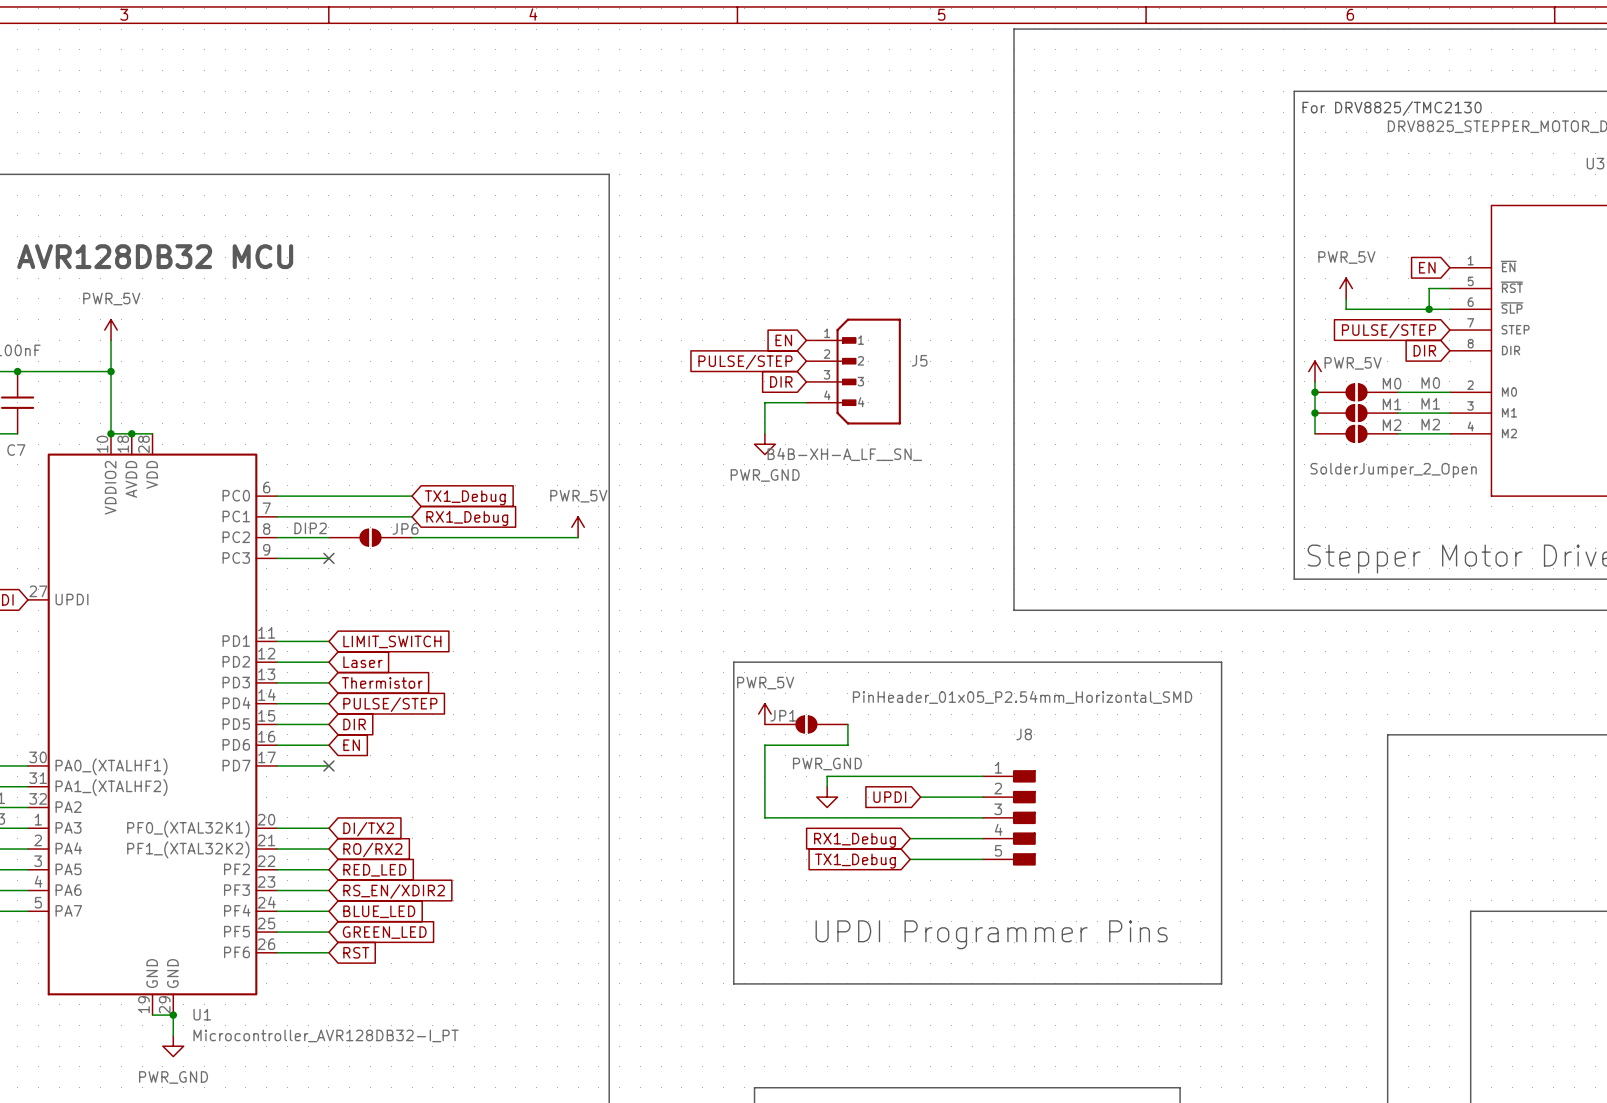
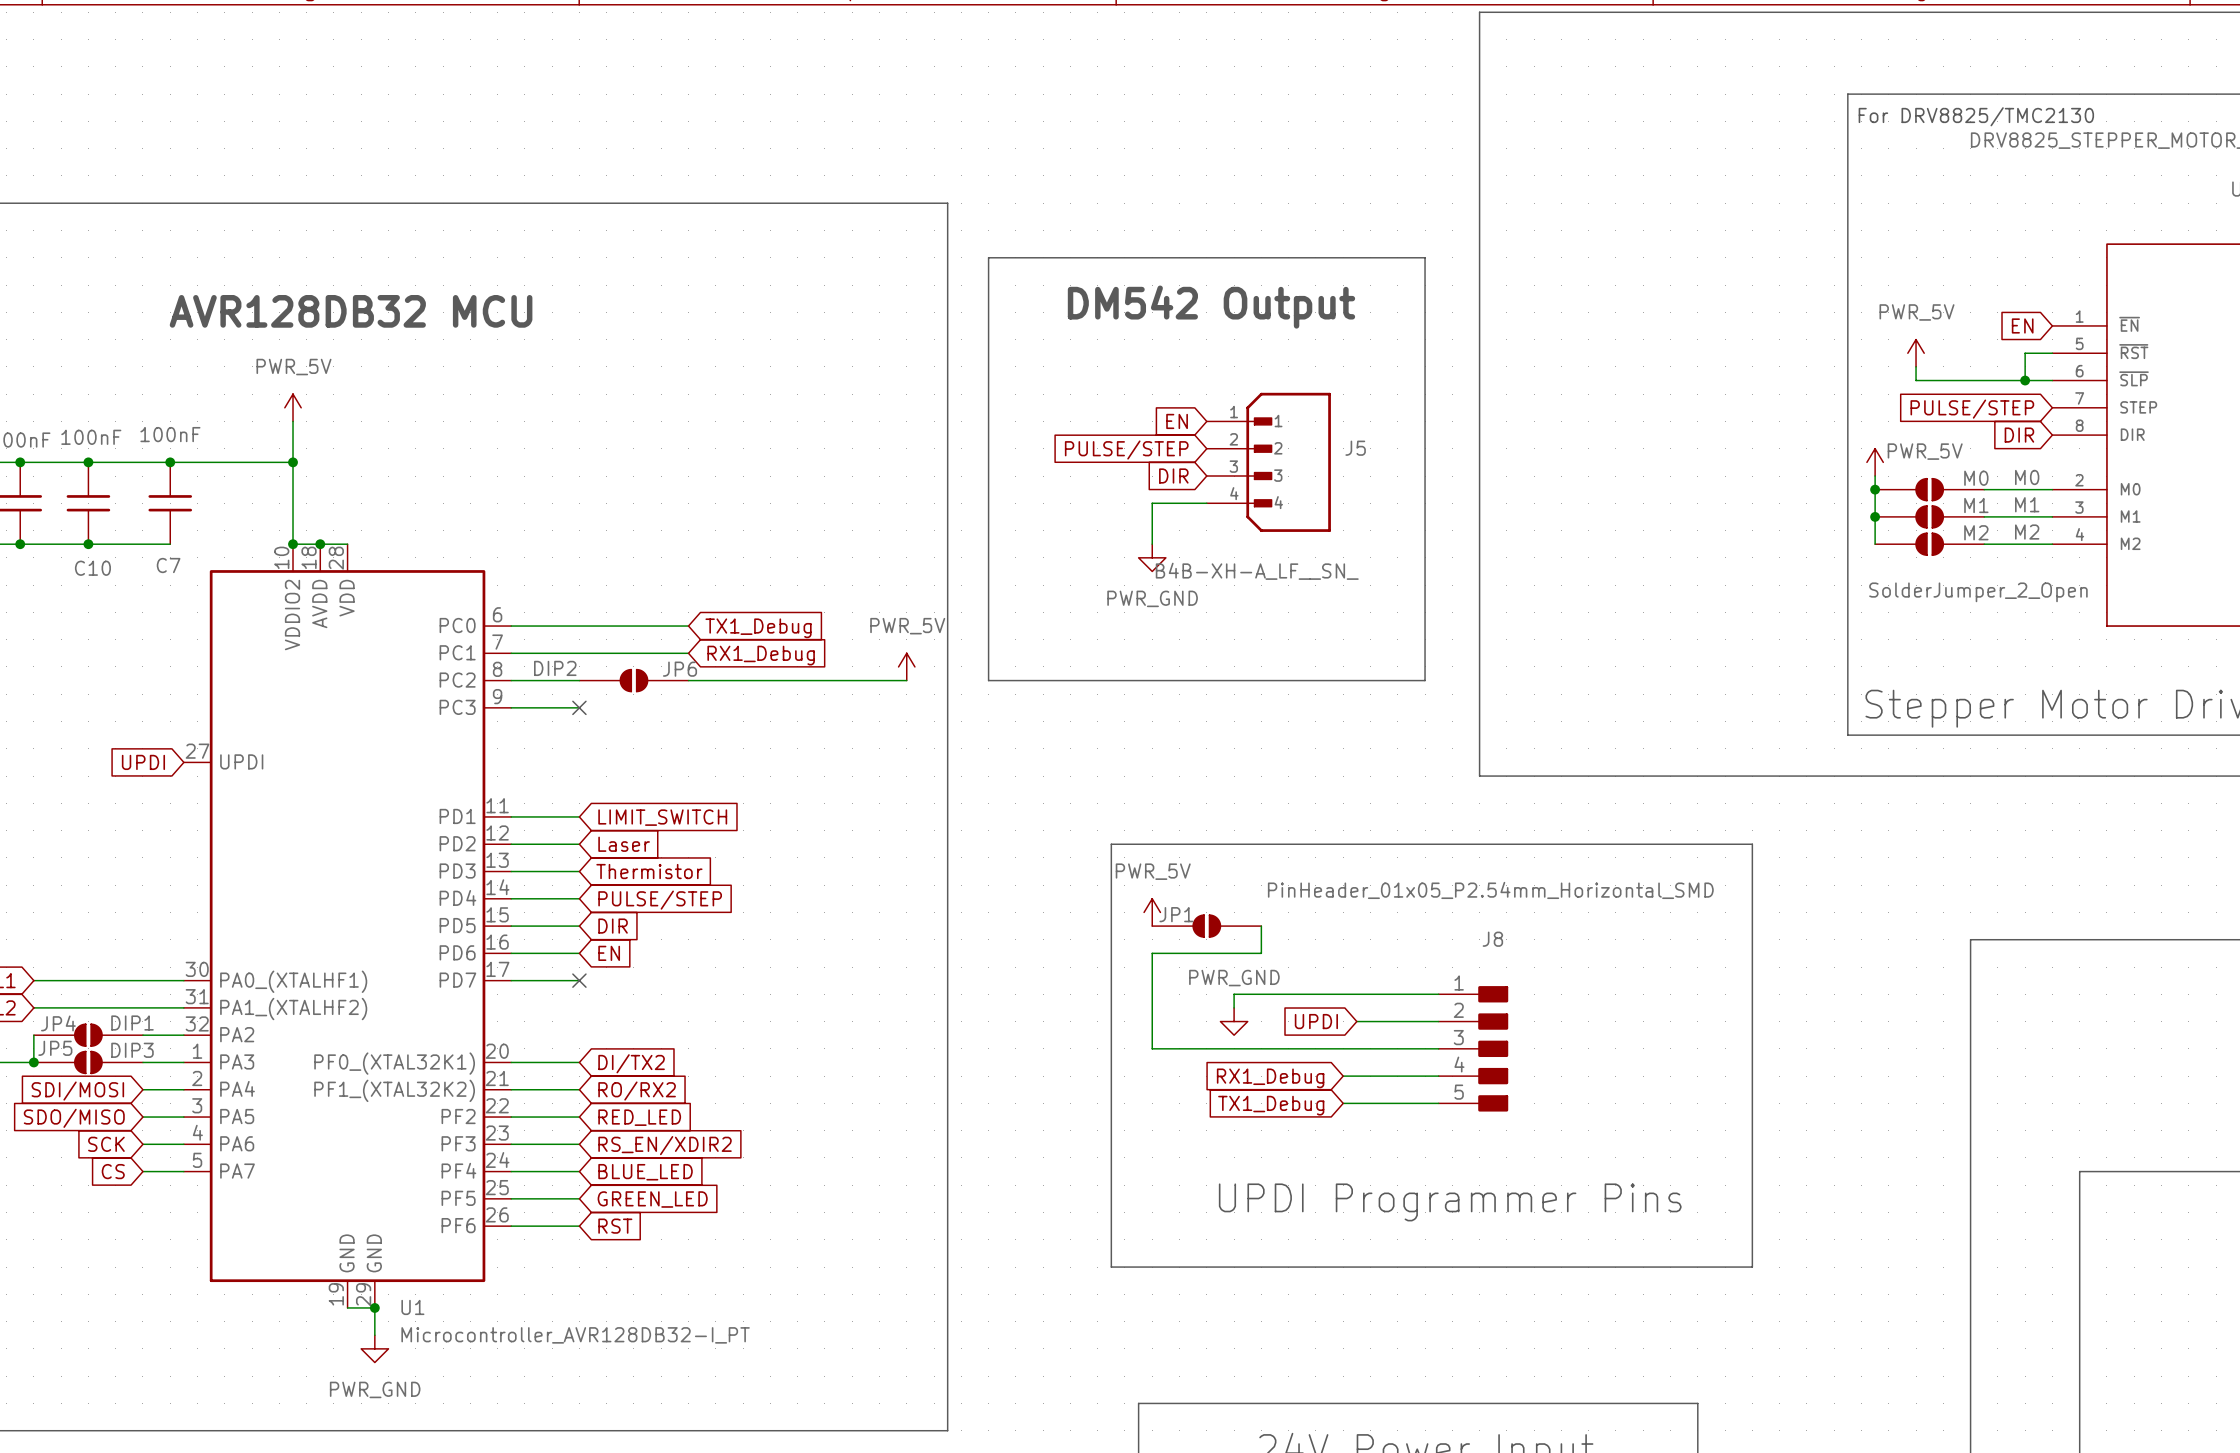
line: none -> (988, 257) (1425, 257) (1425, 680) (988, 680) (988, 257)
text: none -> DM542 Output (1211, 307)

